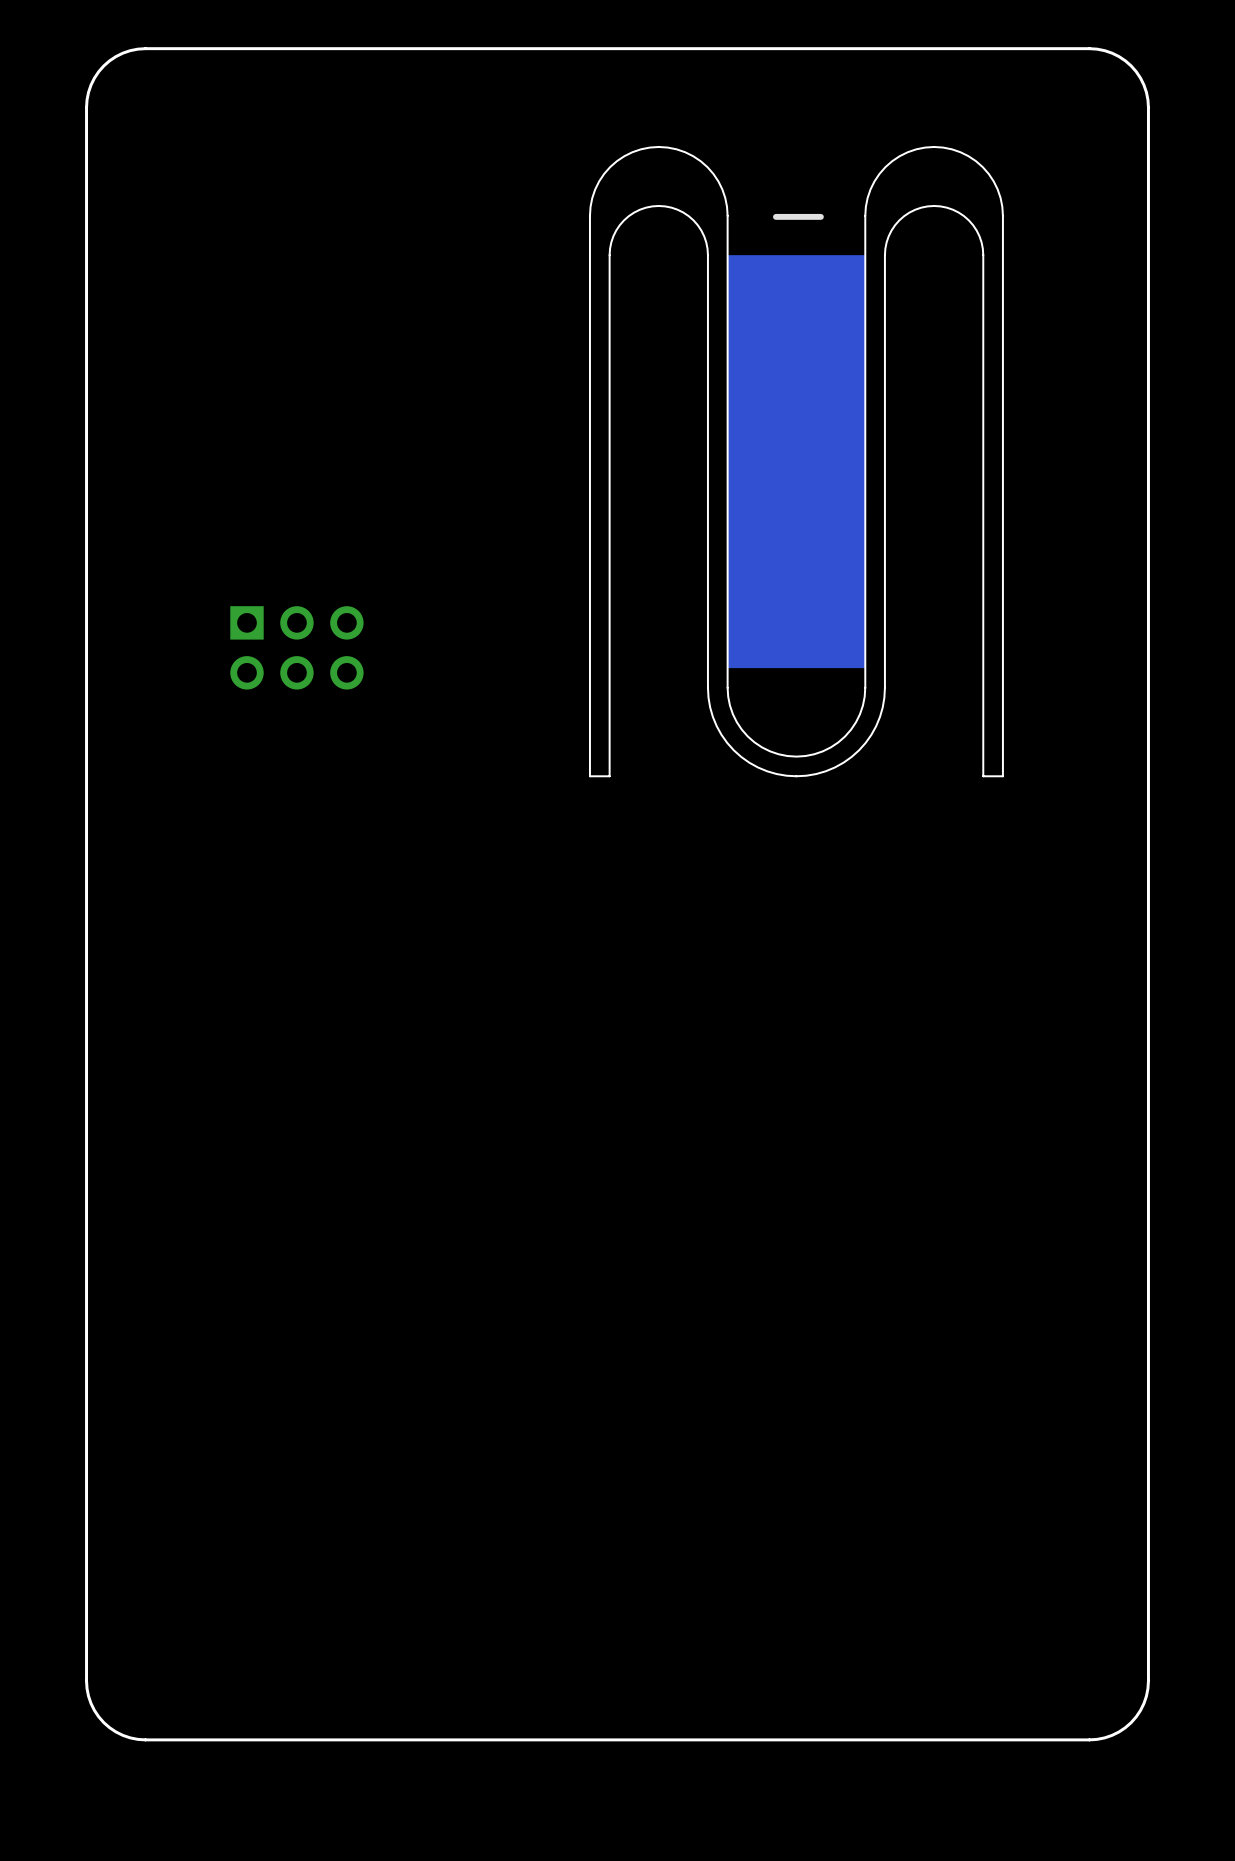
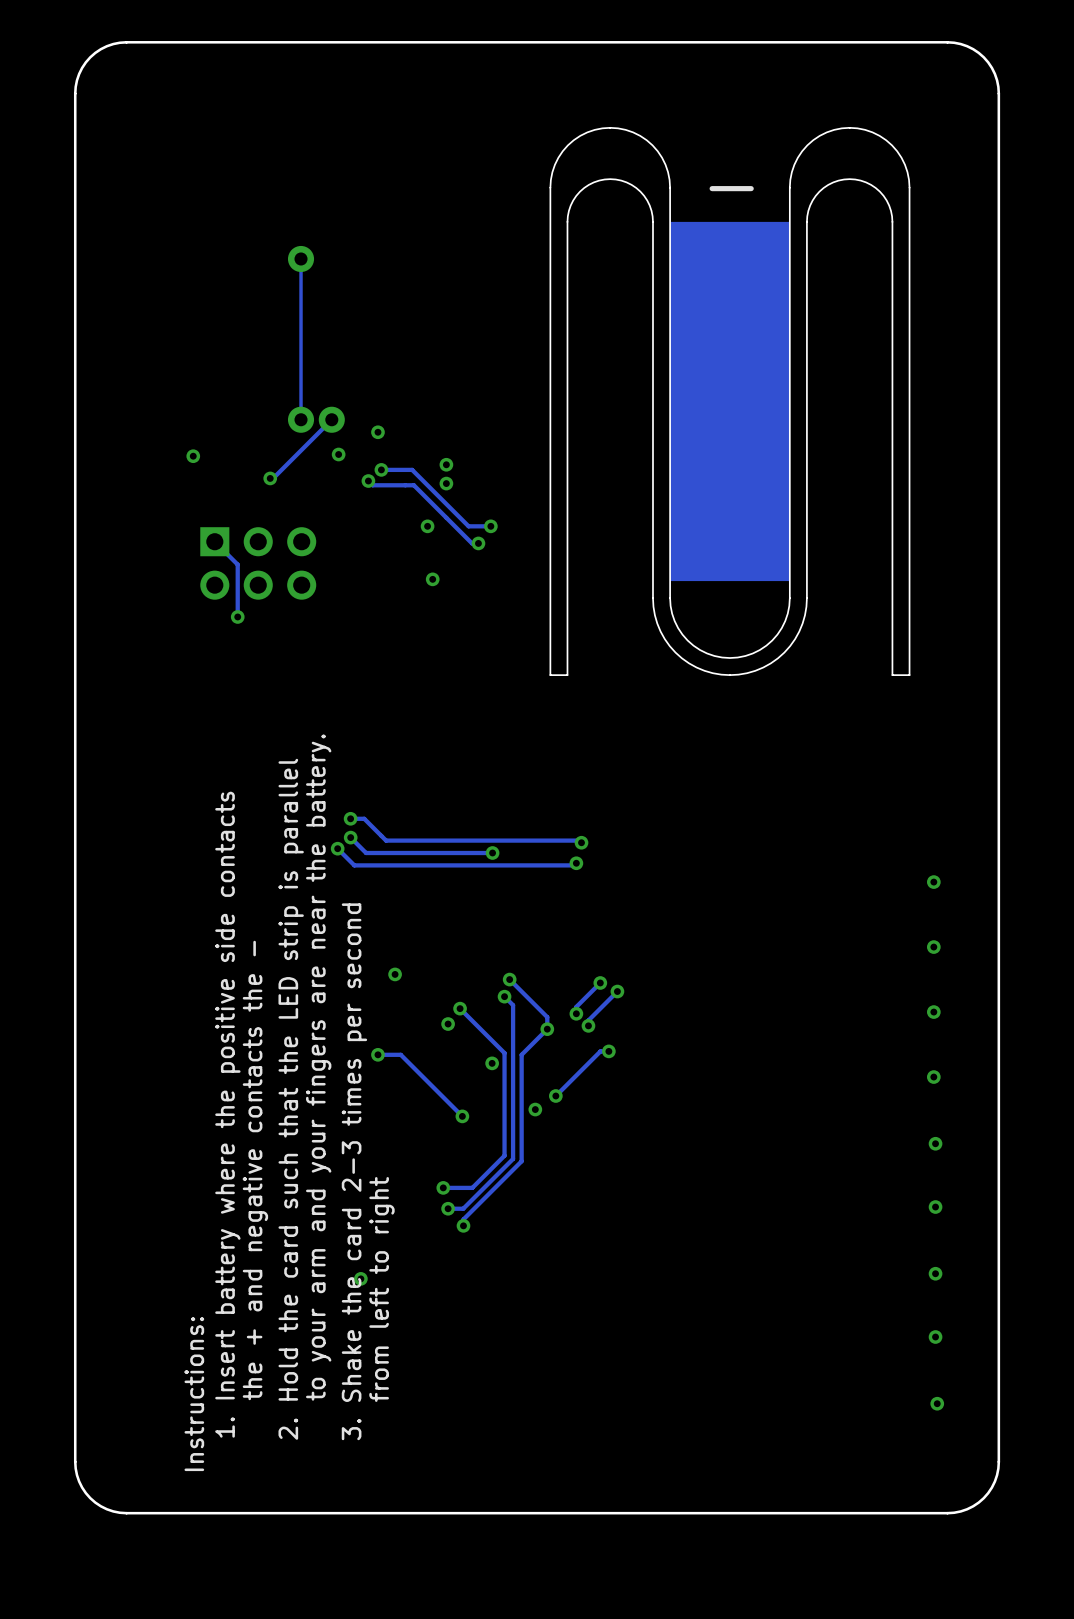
board edge: (934, 146) (907, 152) (892, 161) (879, 173) (867, 197) (865, 215) (864, 696) (856, 722) (845, 736) (830, 747) (805, 756) (778, 754) (754, 742) (736, 722) (728, 696) (727, 215) (722, 189) (713, 173) (700, 161) (685, 152) (658, 146) (640, 149) (624, 156) (610, 167) (599, 181) (592, 197) (589, 215) (589, 776) (609, 776) (610, 248) (616, 230) (624, 220) (639, 209) (658, 205) (677, 209) (688, 216) (701, 230) (707, 248) (707, 687) (710, 707) (721, 734) (741, 756) (767, 771) (786, 775) (816, 774) (834, 767) (851, 756) (871, 734) (882, 707) (884, 687) (884, 255) (888, 236) (895, 225) (904, 216) (915, 209) (927, 206) (940, 206) (952, 209) (964, 216) (976, 230) (981, 242) (983, 255) (983, 776) (1002, 776) (1002, 206) (993, 181) (976, 161) (960, 152) (934, 146) -> (849, 127) (826, 132) (813, 140) (802, 151) (791, 172) (789, 187) (789, 605) (781, 628) (772, 640) (759, 650) (737, 657) (714, 655) (693, 645) (678, 628) (670, 605) (670, 187) (665, 164) (657, 151) (646, 140) (633, 132) (610, 127) (594, 129) (580, 135) (567, 145) (558, 157) (552, 172) (550, 187) (550, 675) (567, 675) (567, 216) (573, 200) (580, 191) (593, 182) (610, 179) (626, 182) (636, 187) (647, 200) (652, 216) (652, 598) (654, 615) (664, 639) (681, 658) (704, 670) (721, 674) (747, 673) (763, 667) (777, 658) (795, 639) (804, 615) (806, 598) (806, 221) (810, 205) (823, 187) (844, 179) (866, 182) (875, 187) (886, 200) (892, 221) (892, 675) (909, 675) (909, 179) (901, 157) (886, 140) (872, 132) (849, 127)
text position: - (798, 216) -> - (731, 188)
part: none -> (316, 339)
part position: (796, 461) -> (729, 401)
track: none -> (331, 419) (273, 478) (270, 478)
via: none -> (377, 432)
via: none -> (338, 454)
via: none -> (193, 456)
via: none -> (446, 464)
track: none -> (381, 469) (412, 469) (468, 526) (490, 526)
via: none -> (381, 469)
via: none -> (270, 478)
track: none -> (368, 481) (372, 485) (413, 485) (472, 543) (478, 543)
via: none -> (368, 481)
via: none -> (446, 483)
via: none -> (427, 526)
via: none -> (490, 526)
track: none -> (214, 541) (237, 564) (237, 616)
via: none -> (478, 543)
via: none -> (432, 579)
via: none -> (237, 616)
track: none -> (350, 818) (364, 818) (386, 840) (579, 840) (581, 842)
via: none -> (350, 818)
track: none -> (350, 837) (366, 853) (492, 853)
via: none -> (350, 837)
via: none -> (581, 842)
track: none -> (337, 848) (354, 865) (574, 865) (576, 863)
via: none -> (337, 848)
via: none -> (492, 853)
via: none -> (576, 863)
via: none -> (933, 882)
via: none -> (933, 947)
via: none -> (395, 974)
track: none -> (509, 979) (547, 1017) (547, 1029) (521, 1054) (521, 1161) (463, 1219) (463, 1225)
via: none -> (509, 979)
track: none -> (600, 982) (576, 1006) (576, 1013)
via: none -> (600, 982)
track: none -> (617, 991) (588, 1020) (588, 1025)
via: none -> (617, 991)
track: none -> (504, 996) (513, 1005) (513, 1158) (463, 1208) (448, 1208)
via: none -> (504, 996)
track: none -> (460, 1008) (504, 1053) (504, 1155) (472, 1187) (443, 1187)
via: none -> (460, 1008)
via: none -> (933, 1012)
via: none -> (576, 1013)
via: none -> (448, 1024)
via: none -> (588, 1025)
via: none -> (547, 1029)
track: none -> (608, 1051) (600, 1051) (555, 1096)
via: none -> (608, 1051)
track: none -> (377, 1054) (400, 1054) (462, 1116)
via: none -> (377, 1054)
via: none -> (492, 1063)
text: none -> to your arm and your fingers are near the battery. (318, 1067)
via: none -> (933, 1077)
via: none -> (555, 1096)
text: none -> 2. Hold the card such that the LED strip is parallel (291, 1099)
via: none -> (535, 1109)
text: none -> 1. Insert battery where the positive side contacts (227, 1114)
via: none -> (462, 1116)
via: none -> (935, 1143)
text: none -> the + and negative contacts the - (255, 1170)
text: none -> 3. Shake the card 2-3 times per second (354, 1171)
via: none -> (443, 1187)
via: none -> (935, 1207)
via: none -> (448, 1208)
via: none -> (463, 1225)
via: none -> (935, 1273)
via: none -> (360, 1278)
text: none -> from left to right (381, 1289)
via: none -> (935, 1337)
text: none -> Instructions: (194, 1394)
via: none -> (937, 1403)

